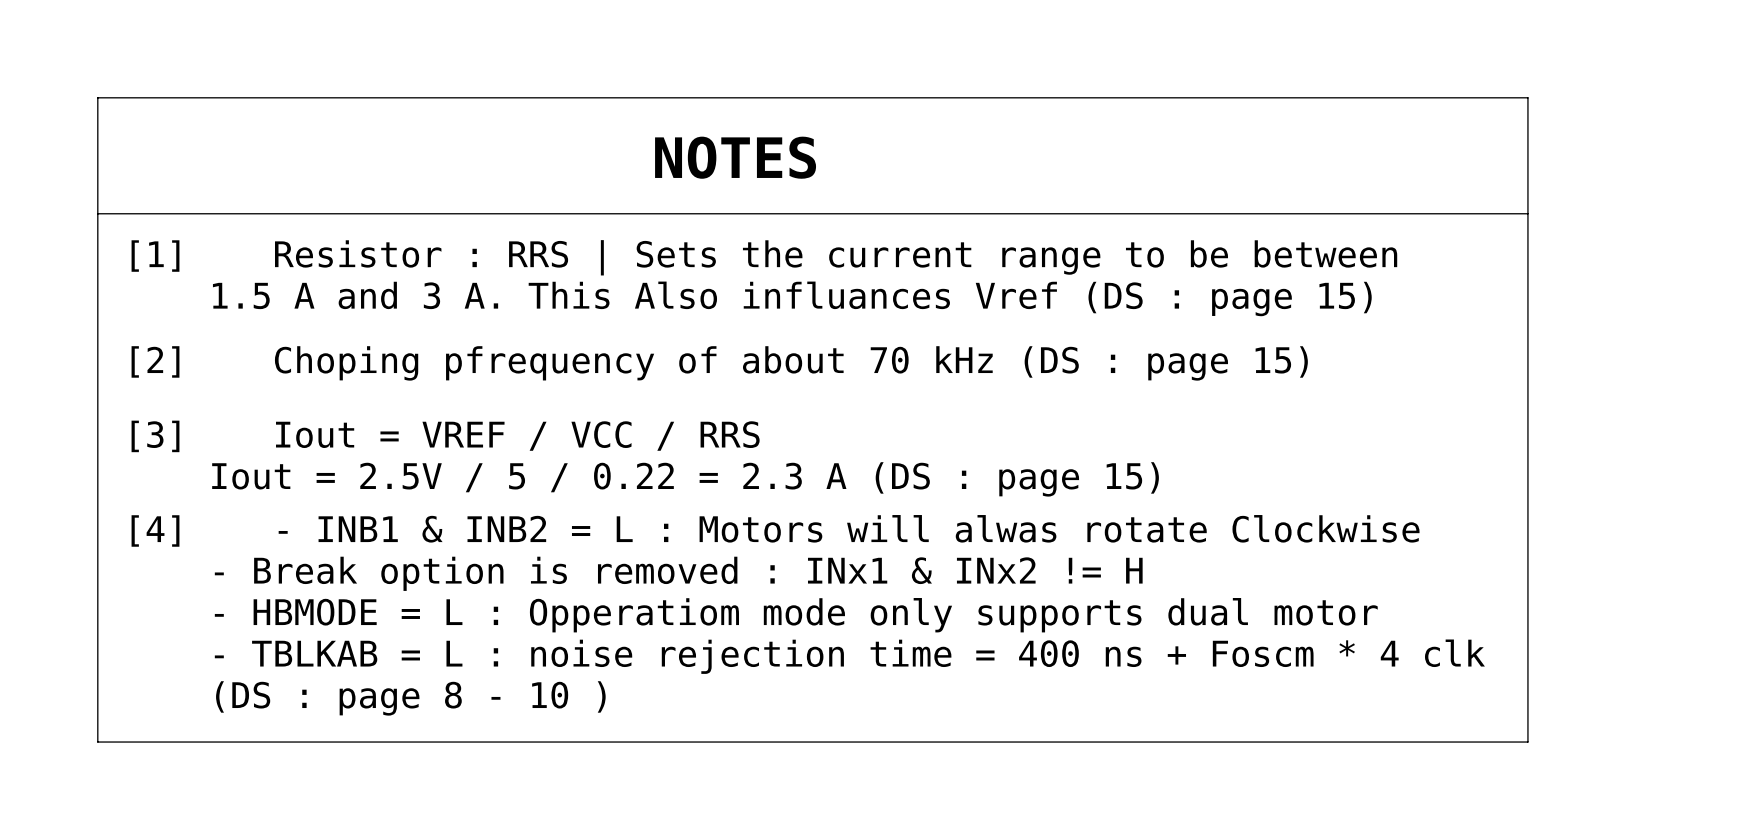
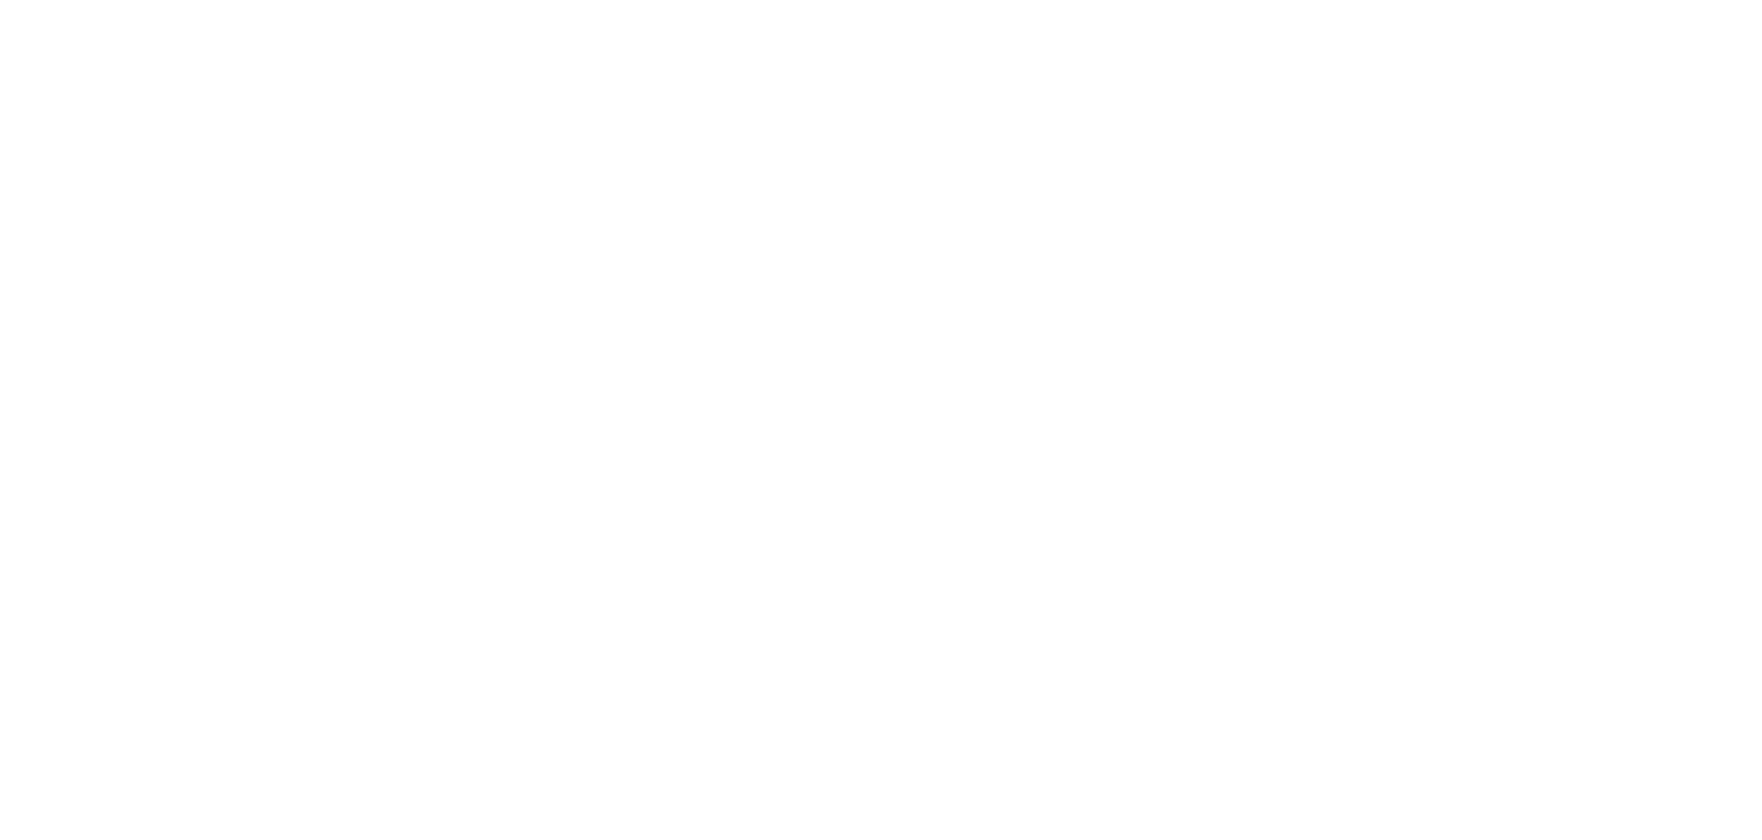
line: (97, 97) (1527, 97) (1527, 742) (97, 742) (97, 97) -> none
text: NOTES (735, 157) -> none
line: (97, 213) (1527, 213) -> none
text: [1] Resistor : RRS | Sets the current range to be between (764, 257) -> none
text: 1.5 A and 3 A. This Also influances Vref (DS : page 15) (792, 298) -> none
text: [2] Choping pfrequency of about 70 kHz (DS : page 15) (719, 363) -> none
text: [3] Iout = VREF / VCC / RRS (445, 436) -> none
text: Iout = 2.5V / 5 / 0.22 = 2.3 A (DS : page 15) (685, 479) -> none
text: [4] - INB1 & INB2 = L : Motors will alwas rotate Clockwise (775, 530) -> none
text: - Break option is removed : INx1 & INx2 != H (678, 573) -> none
text: - HBMODE = L : Opperatiom mode only supports dual motor (796, 615) -> none
text: - TBLKAB = L : noise rejection time = 400 ns + Foscm * 4 clk (849, 656) -> none
text: (DS : page 8 - 10 ) (410, 698) -> none

